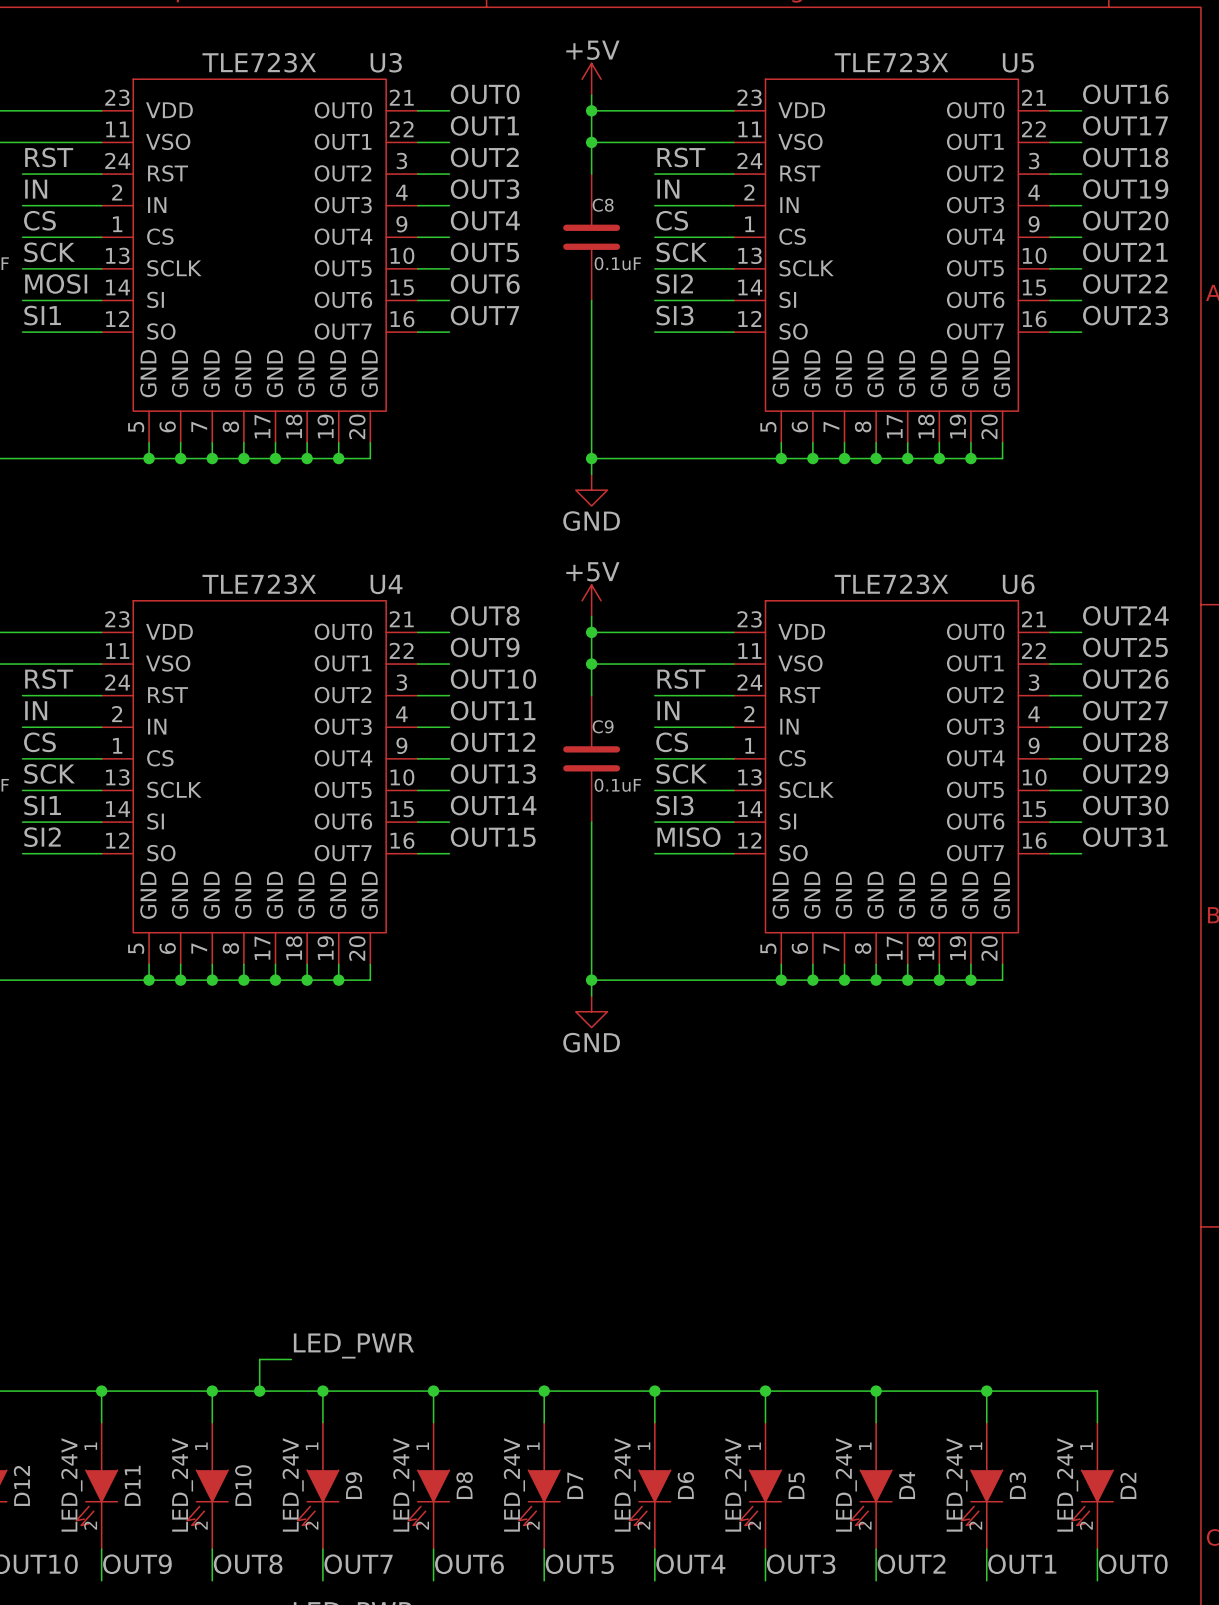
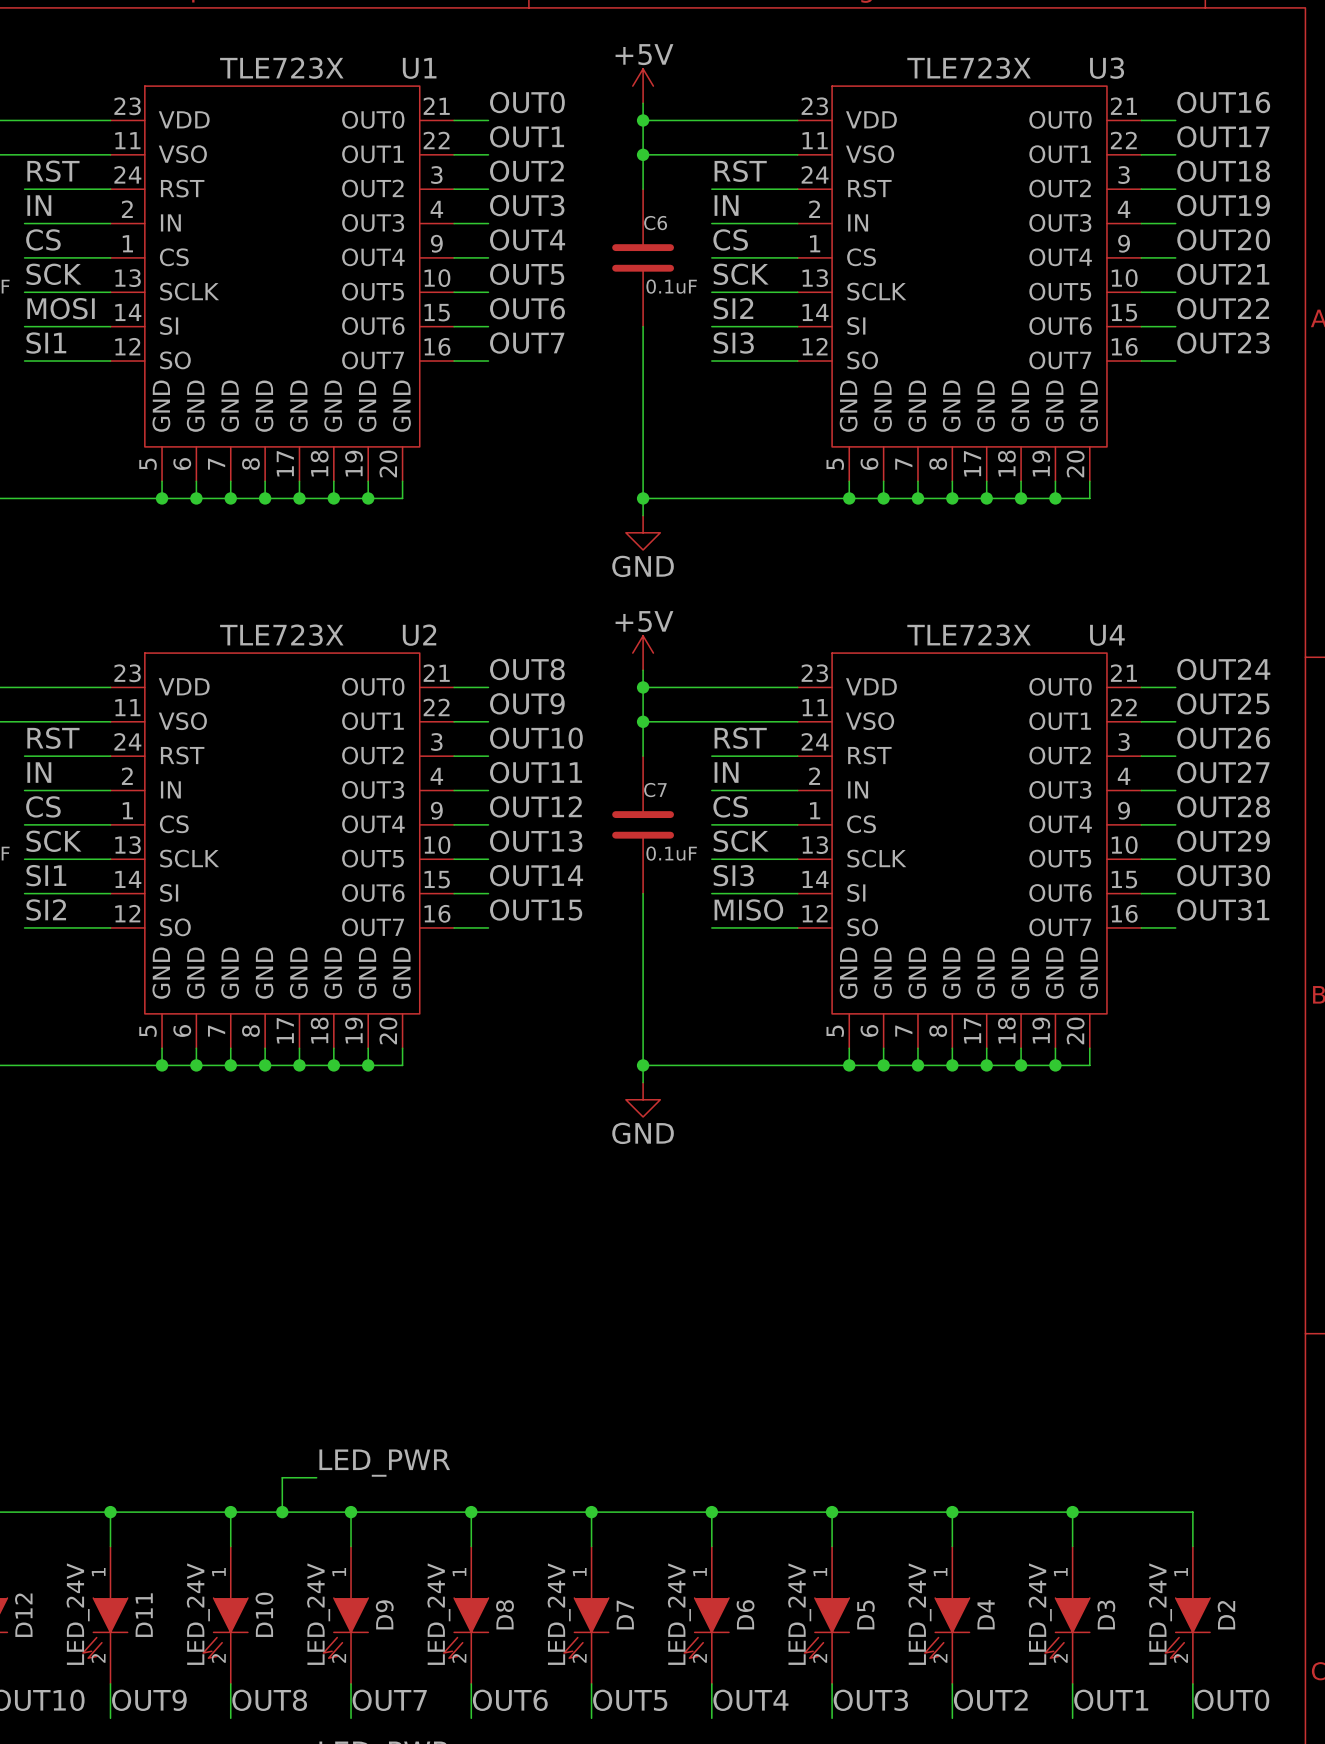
U3 name: U3 (386, 62) -> U1 (419, 68)
U5 name: U5 (1018, 62) -> U3 (1107, 68)
C8 name: C8 (603, 205) -> C6 (655, 223)
U4 name: U4 (386, 584) -> U2 (419, 635)
U6 name: U6 (1018, 584) -> U4 (1107, 635)
C9 name: C9 (603, 726) -> C7 (655, 790)

